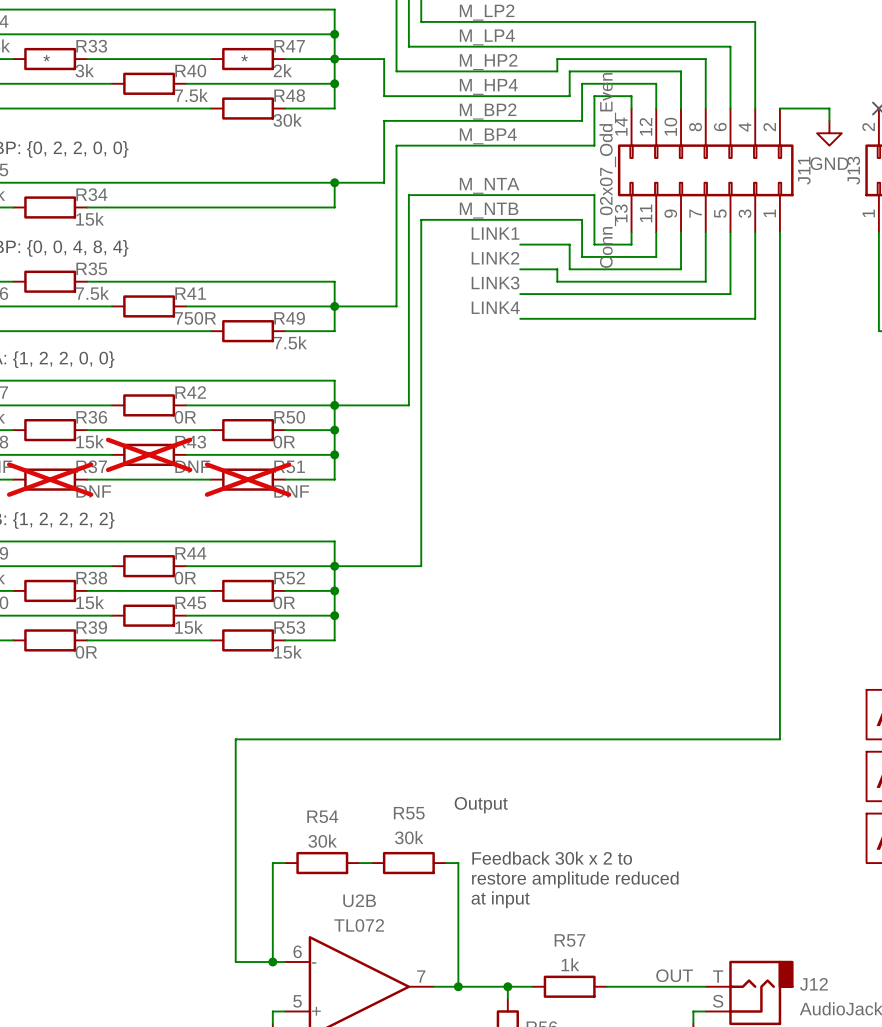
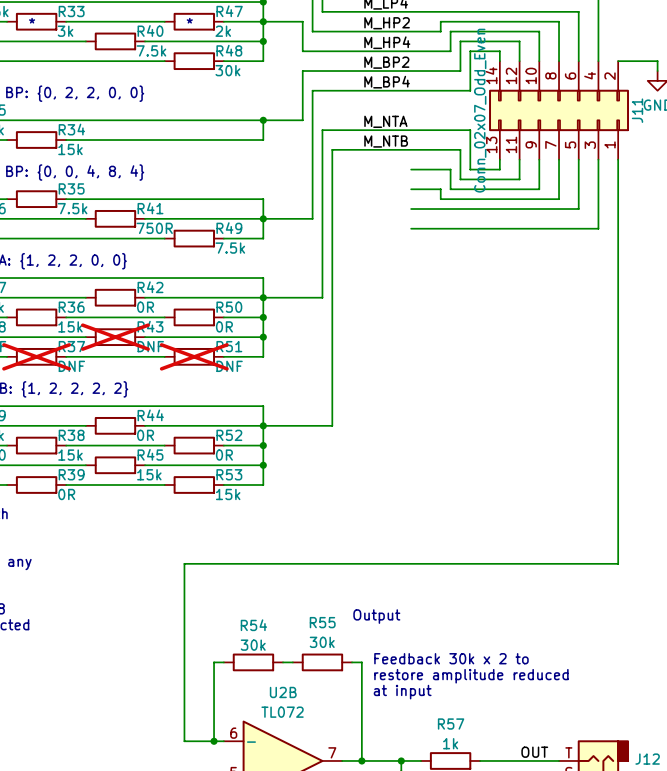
label: LINK1 (495, 233) -> none
label: LINK2 (495, 258) -> none
label: LINK3 (495, 283) -> none
label: LINK4 (495, 307) -> none

